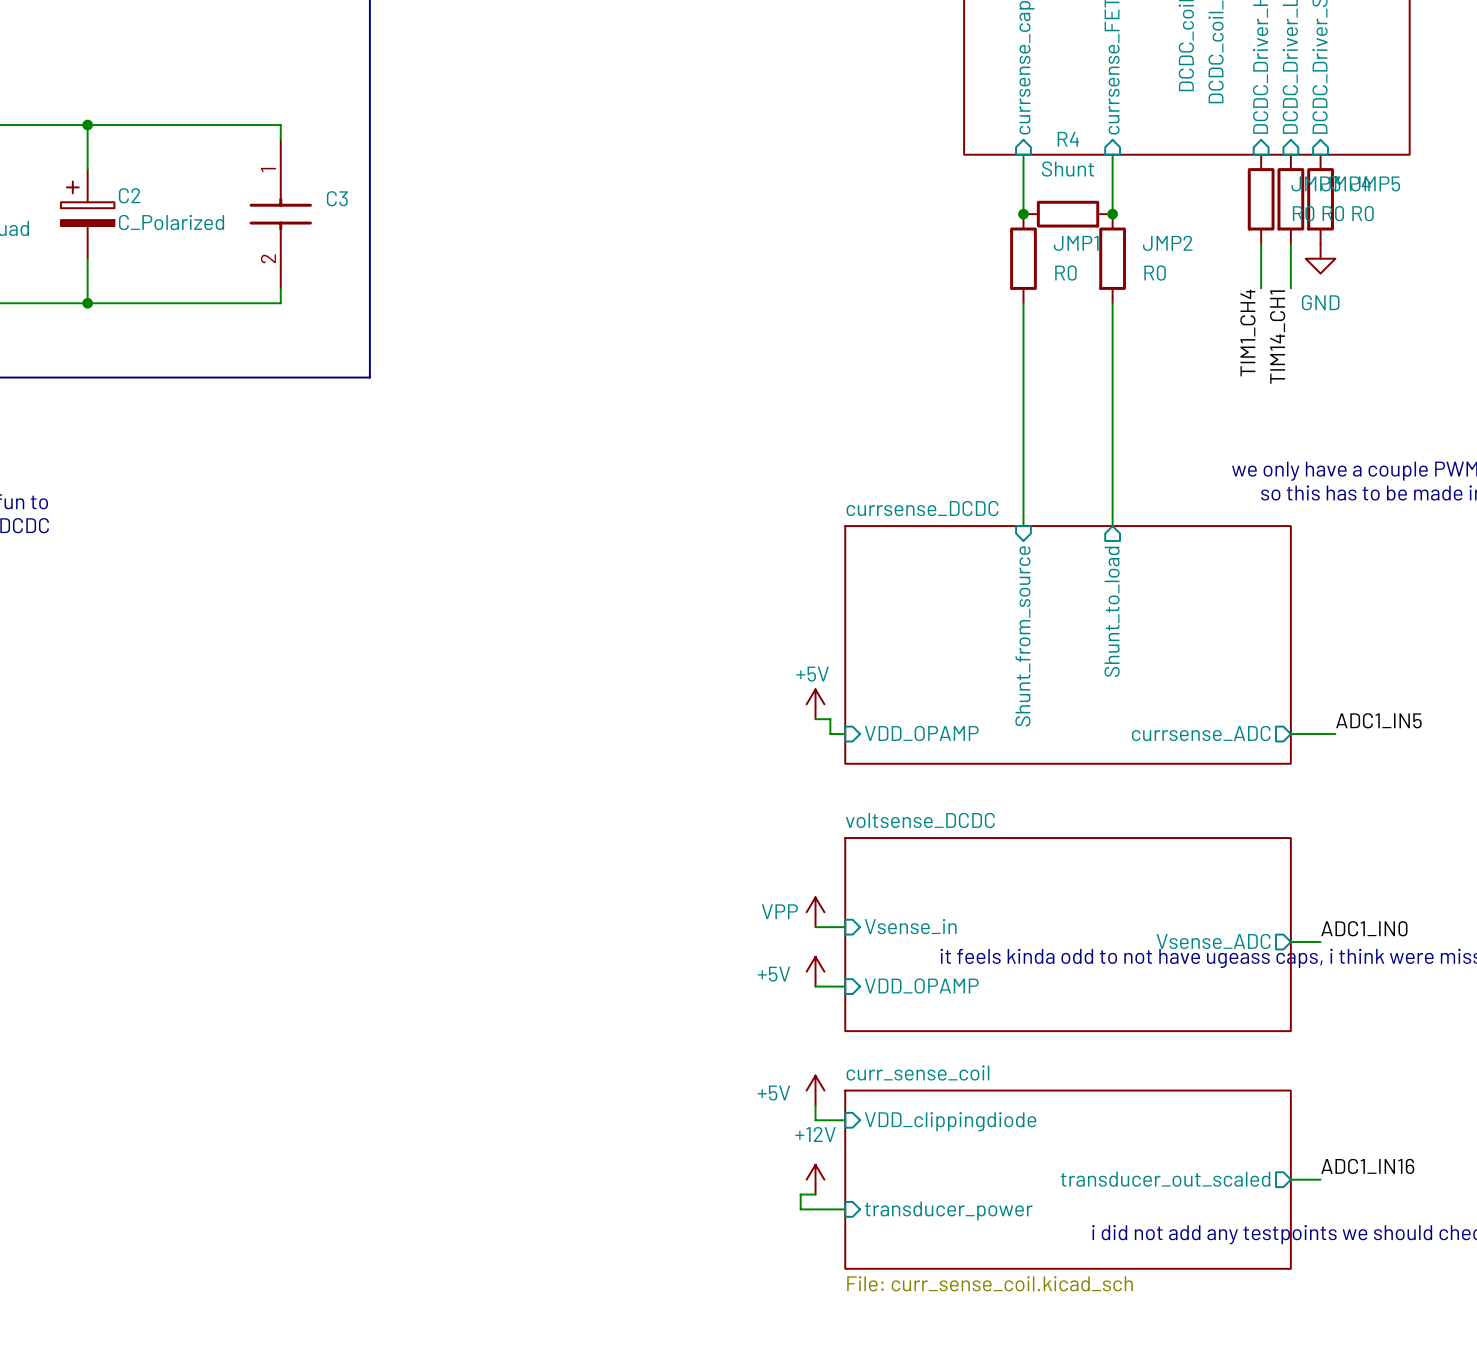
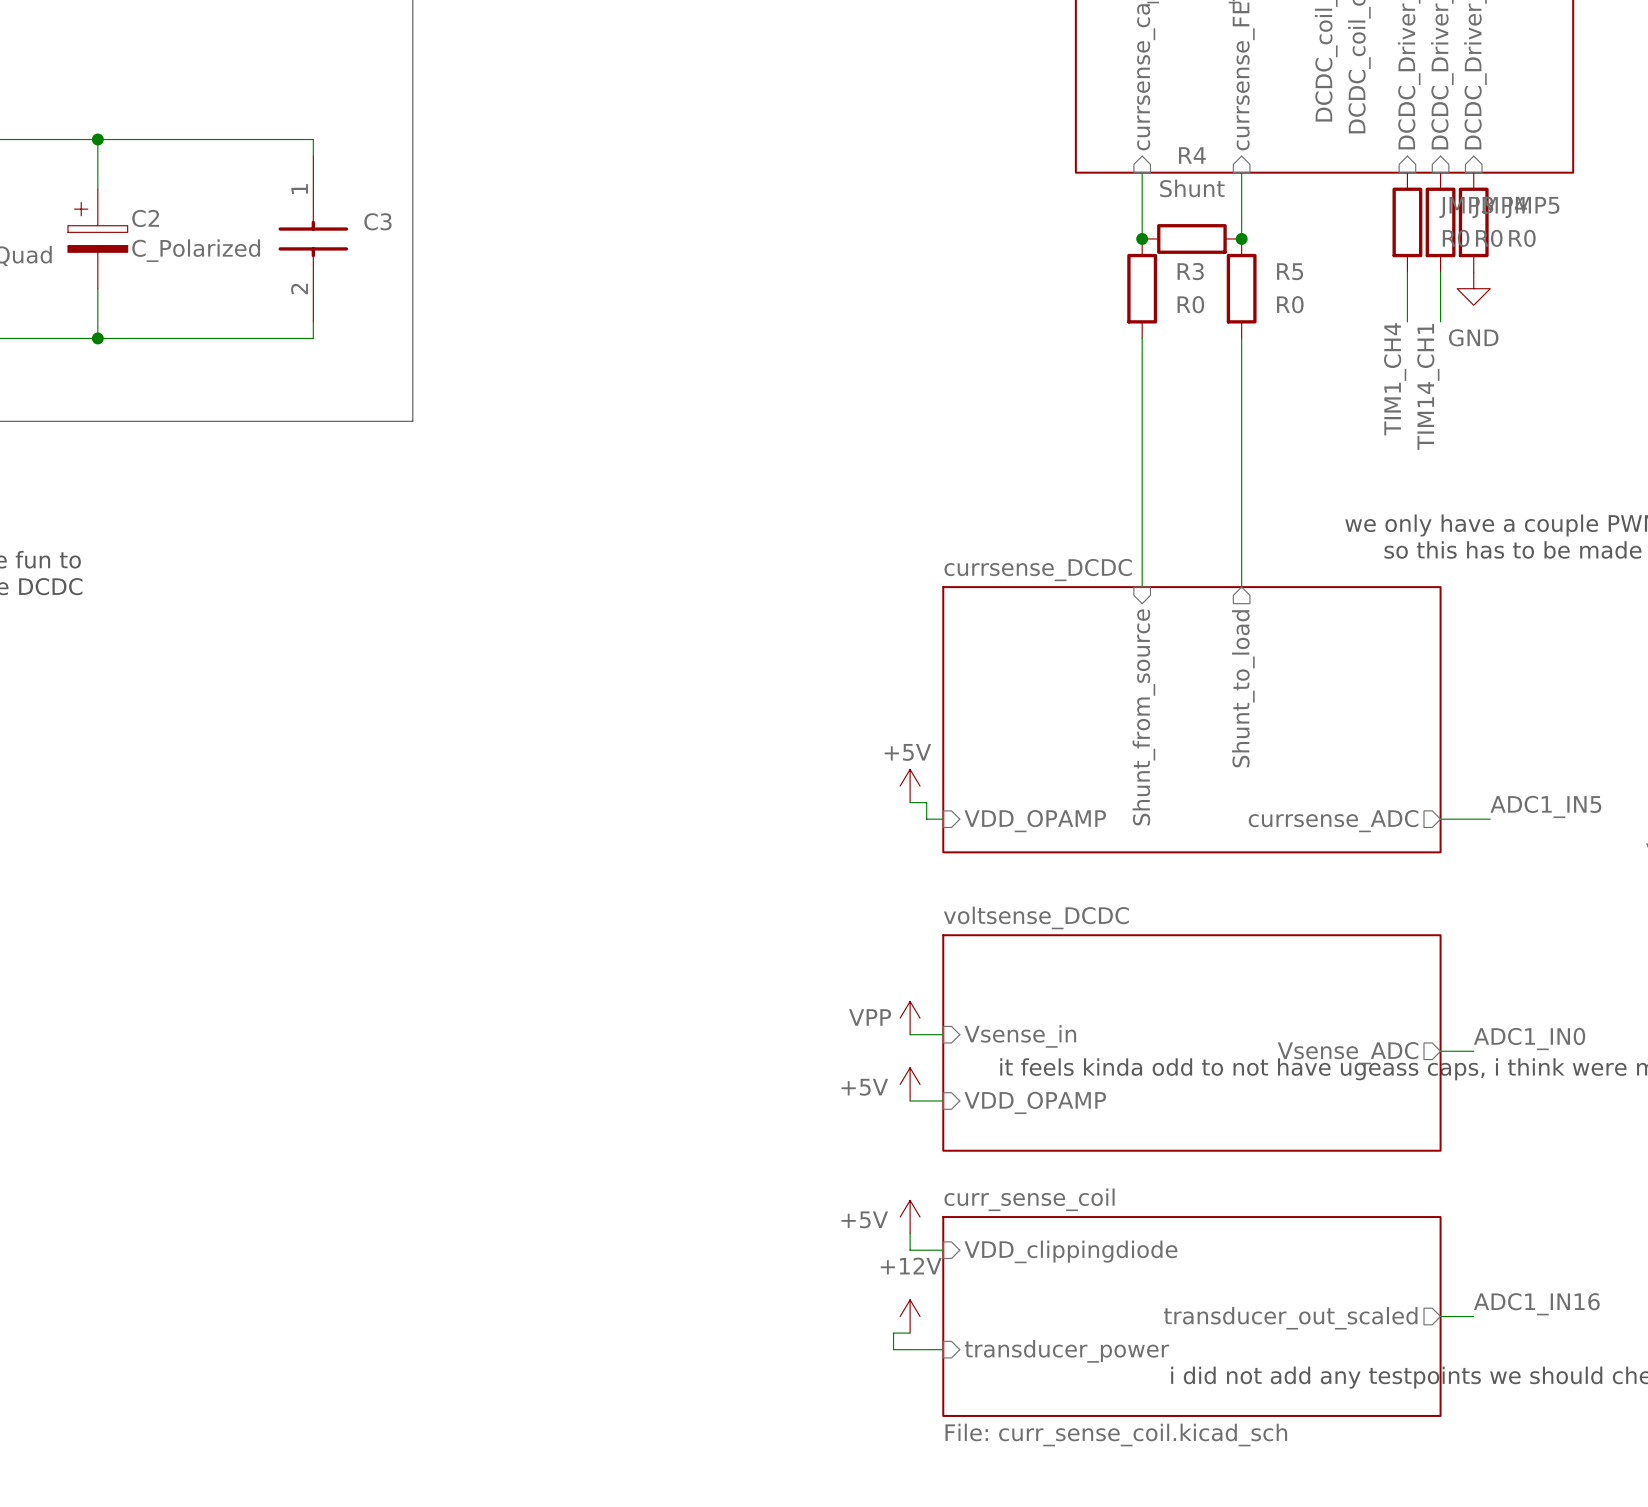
JMP1 name: JMP1 (1076, 243) -> R3 (1190, 271)
JMP2 name: JMP2 (1167, 243) -> R5 (1290, 271)

